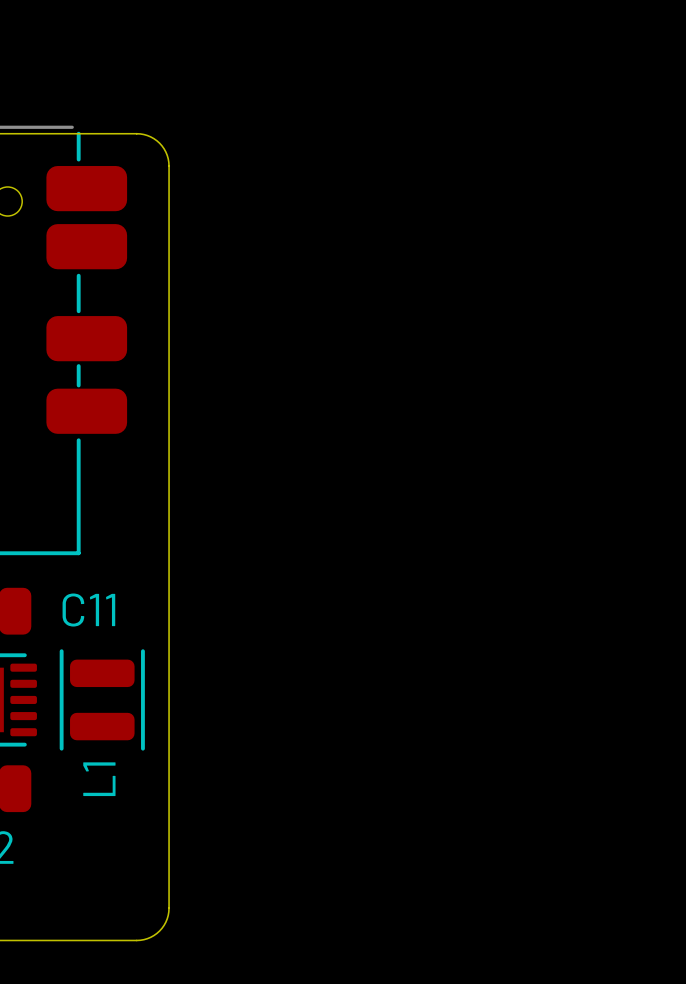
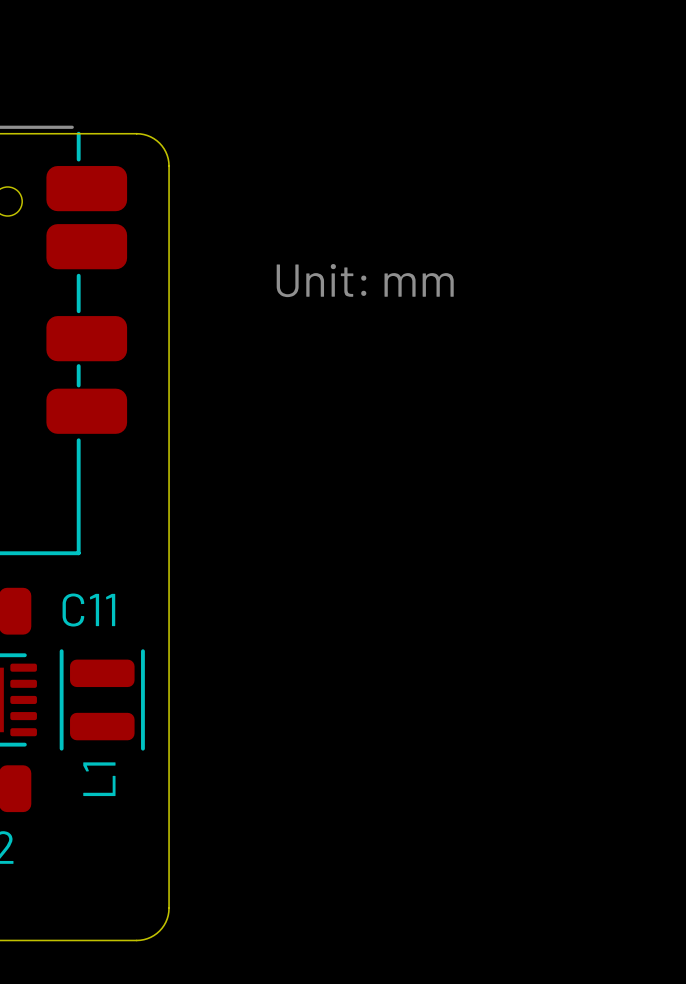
text: none -> Unit: mm (365, 280)

